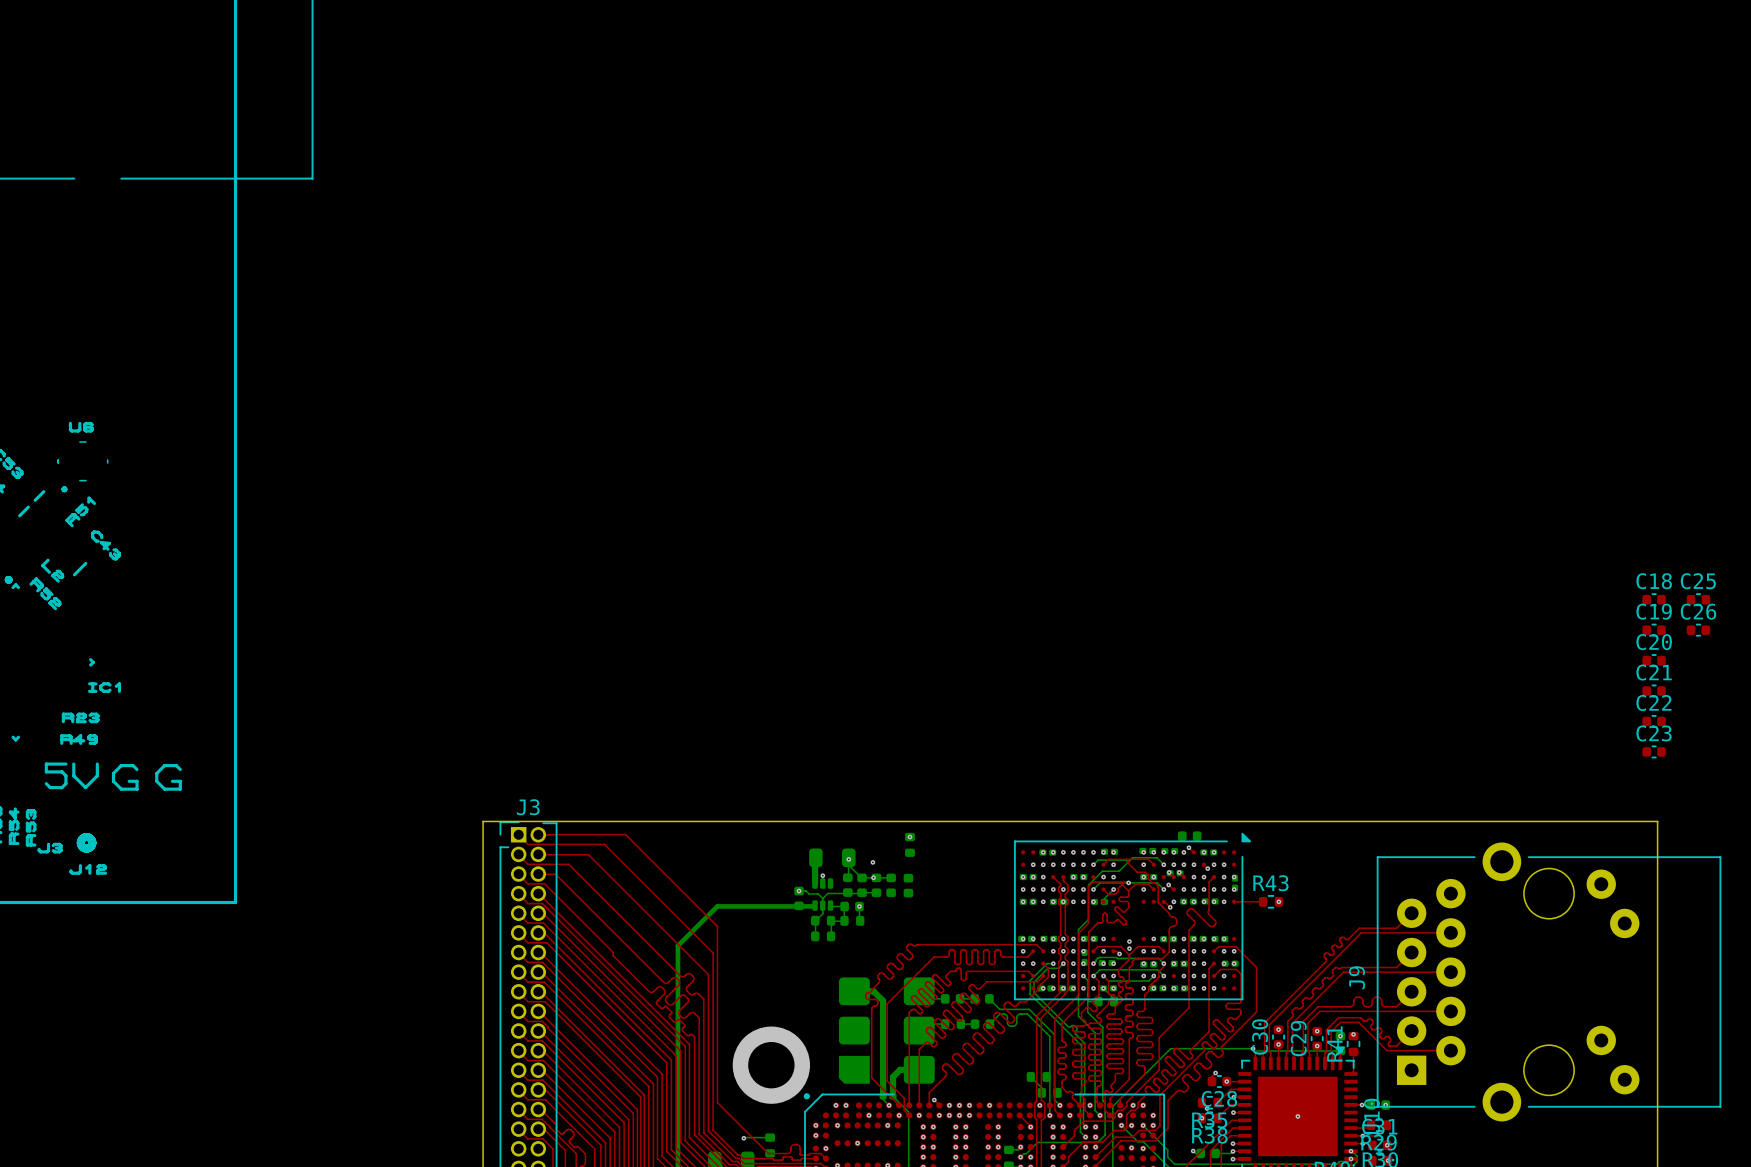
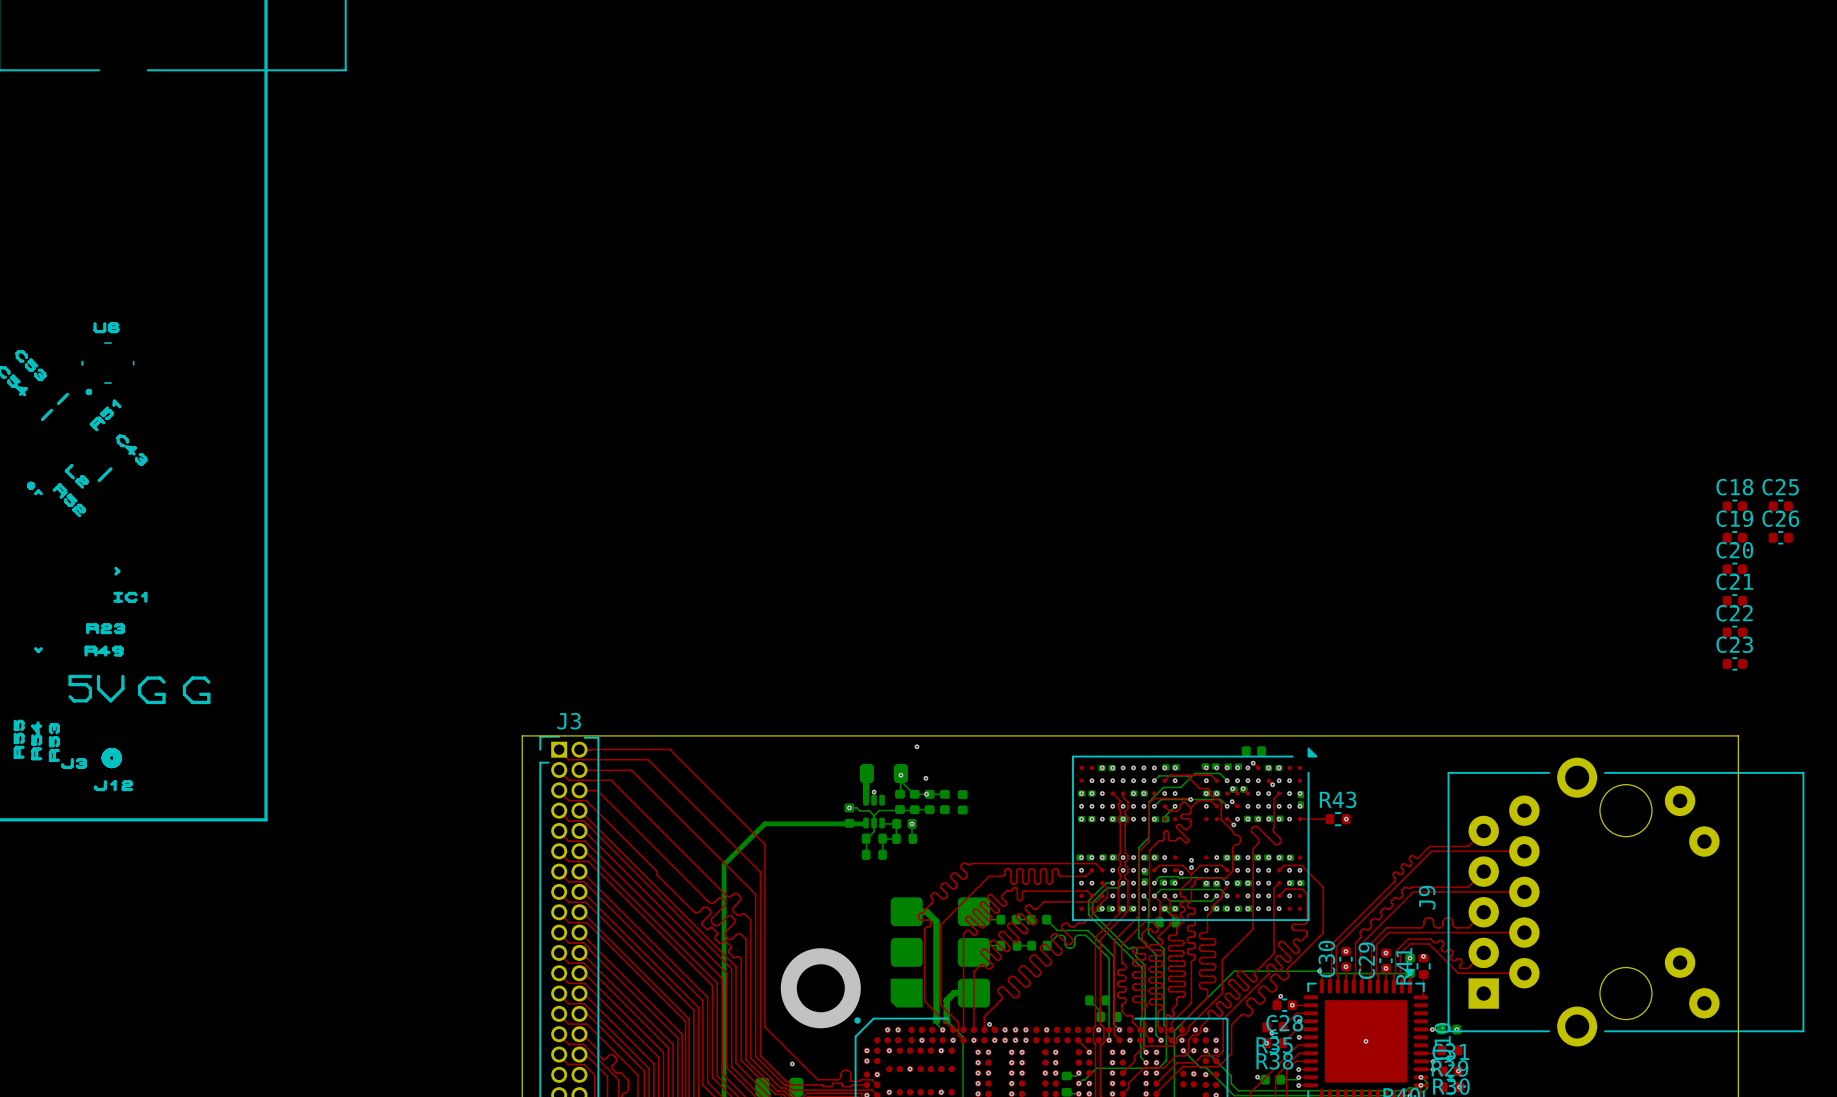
via position: (909, 837) -> (916, 746)
part: (909, 844) -> none
bottom track: (770, 1137) (743, 1138) -> none
part: (770, 1145) -> none

